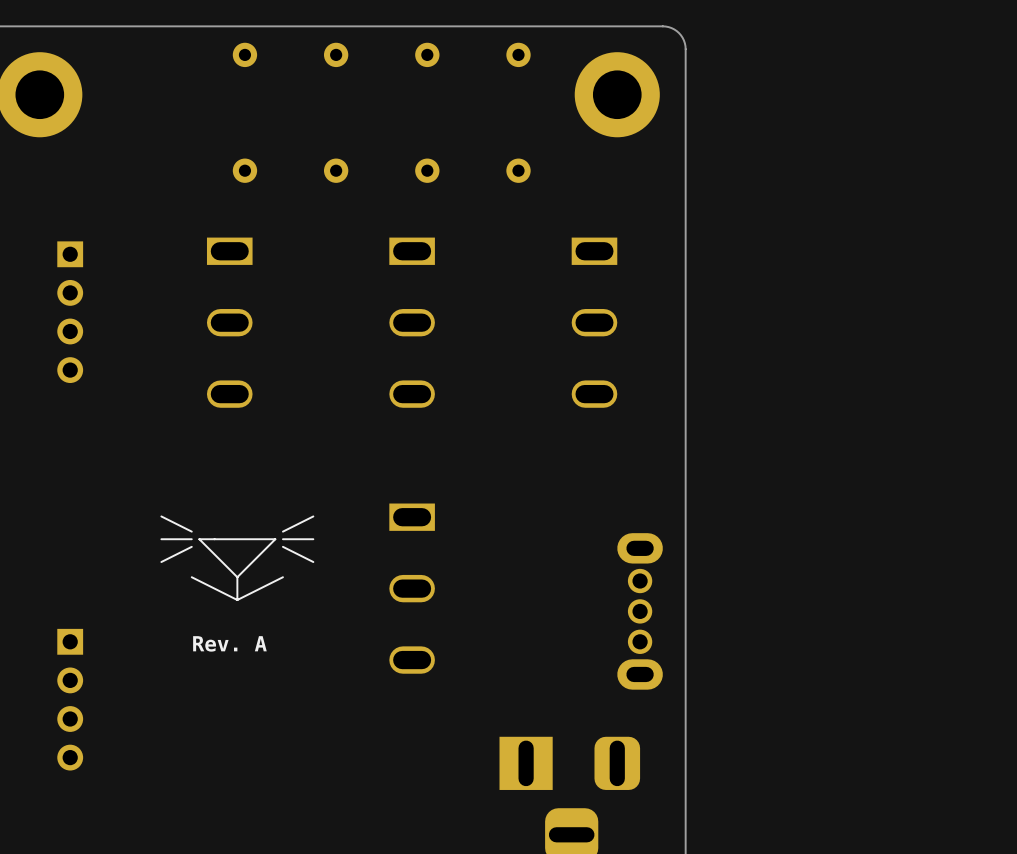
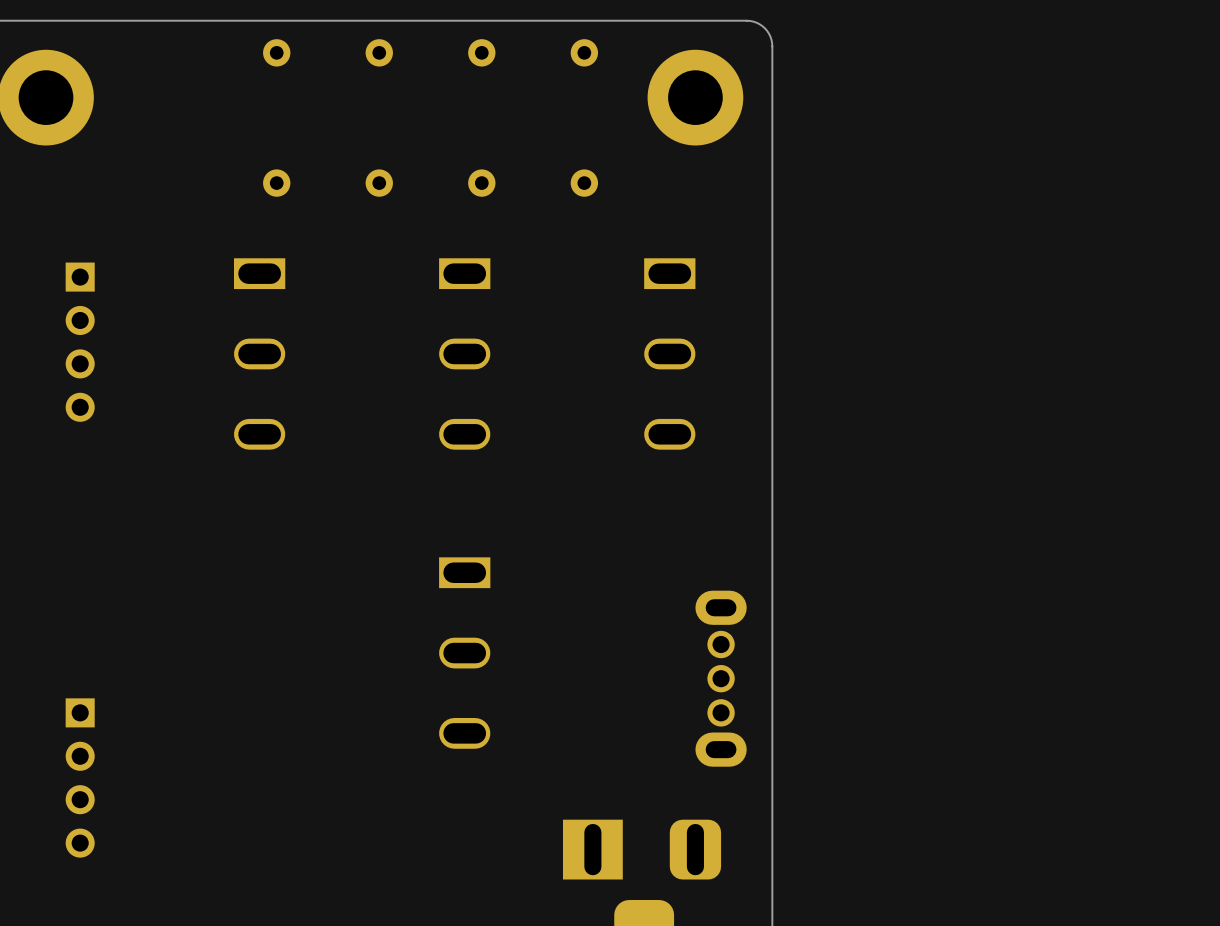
drawing: [160, 515, 315, 601] -> none
text: Rev. A (229, 643) -> none

